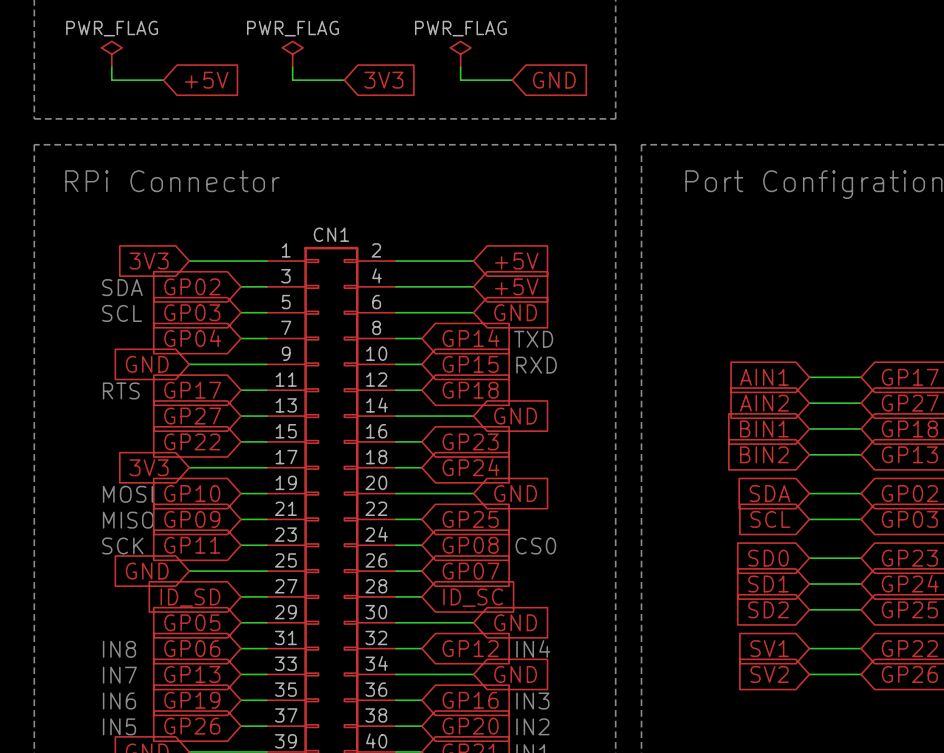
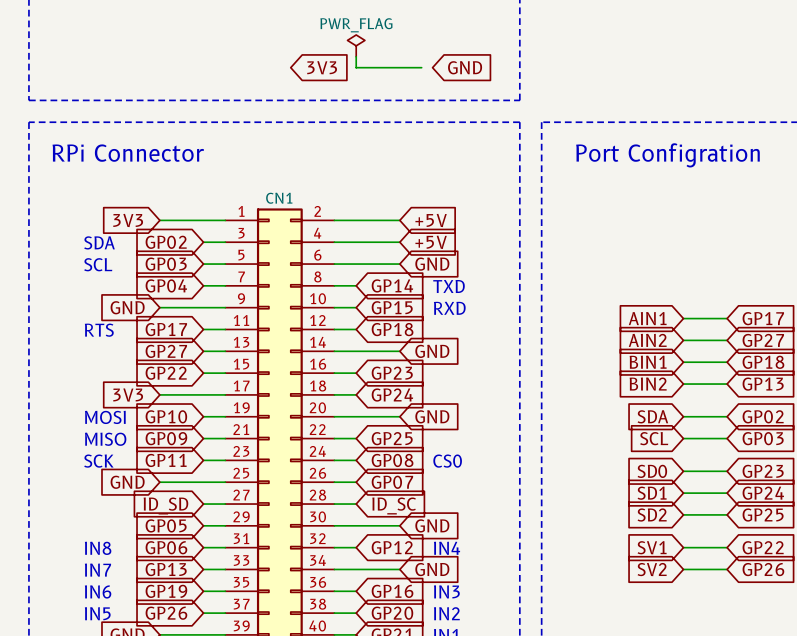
power symbol: PWR_FLAG (111, 54) -> none
power symbol: PWR_FLAG (292, 54) -> none
power symbol position: PWR_FLAG (460, 54) -> PWR_FLAG (356, 45)
wire: (111, 67) (111, 80) (163, 80) -> none
wire: (292, 67) (292, 80) (344, 80) -> none
wire: (460, 67) (460, 80) -> (356, 56) (356, 67) (388, 67)
global label: +5V (206, 80) -> none
wire: (499, 80) (512, 80) -> none

